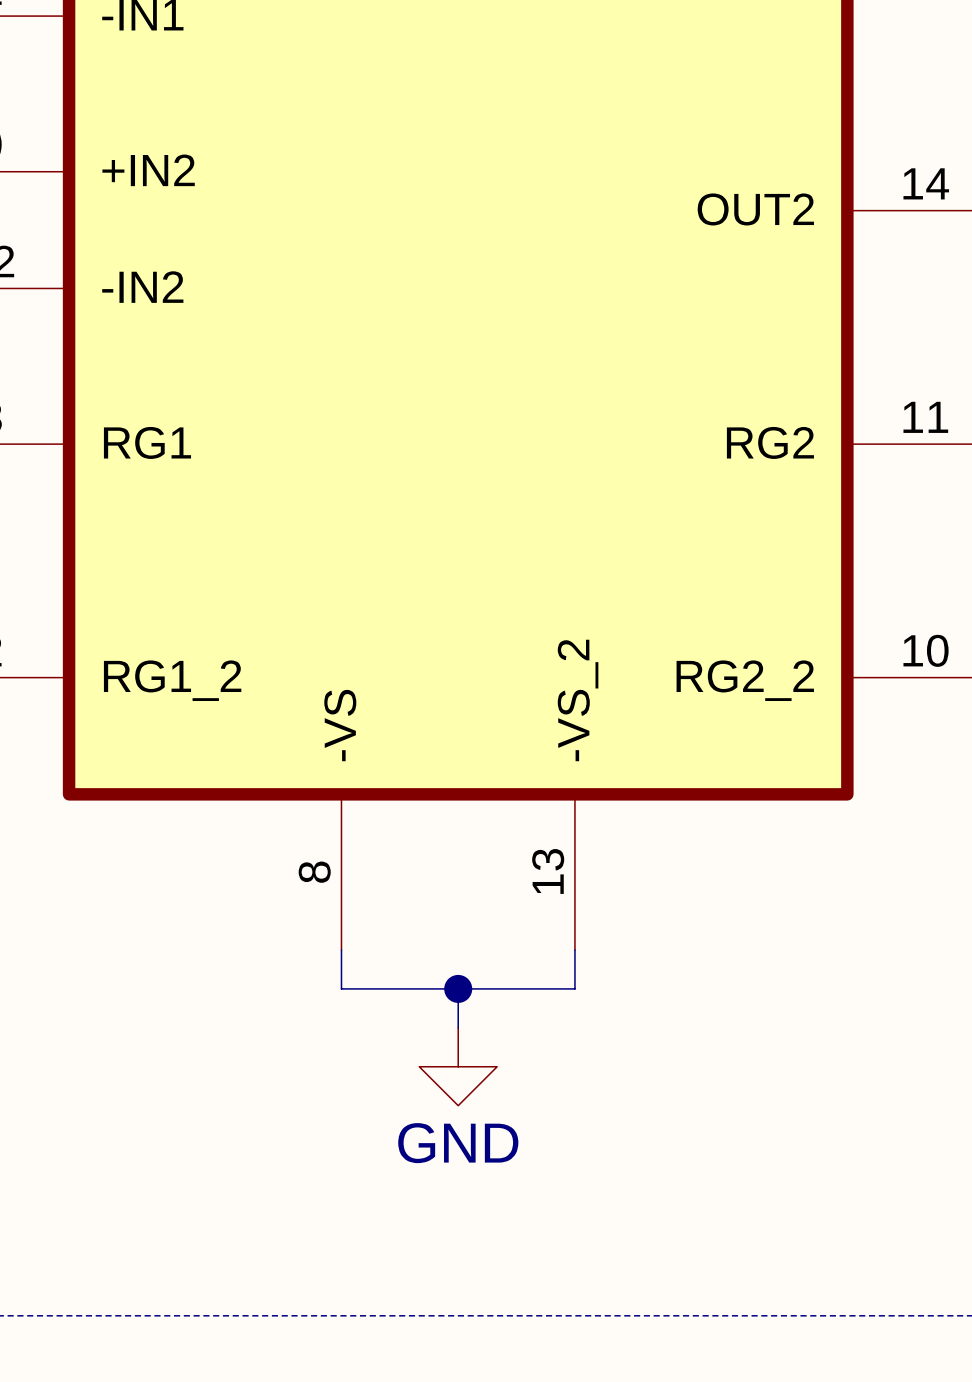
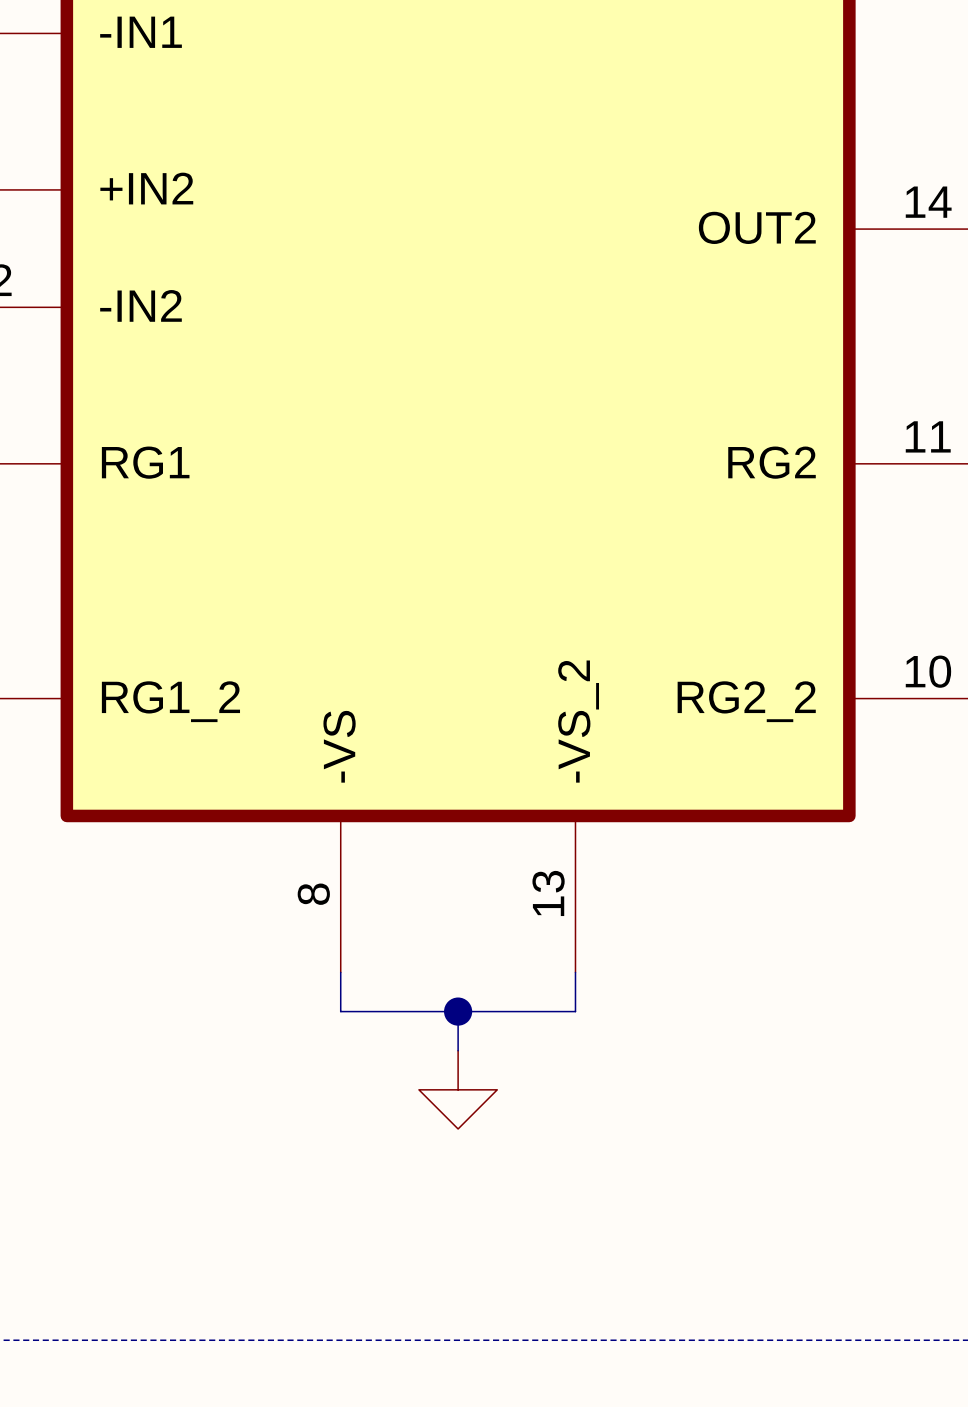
power symbol text: GND (458, 1143) -> none

